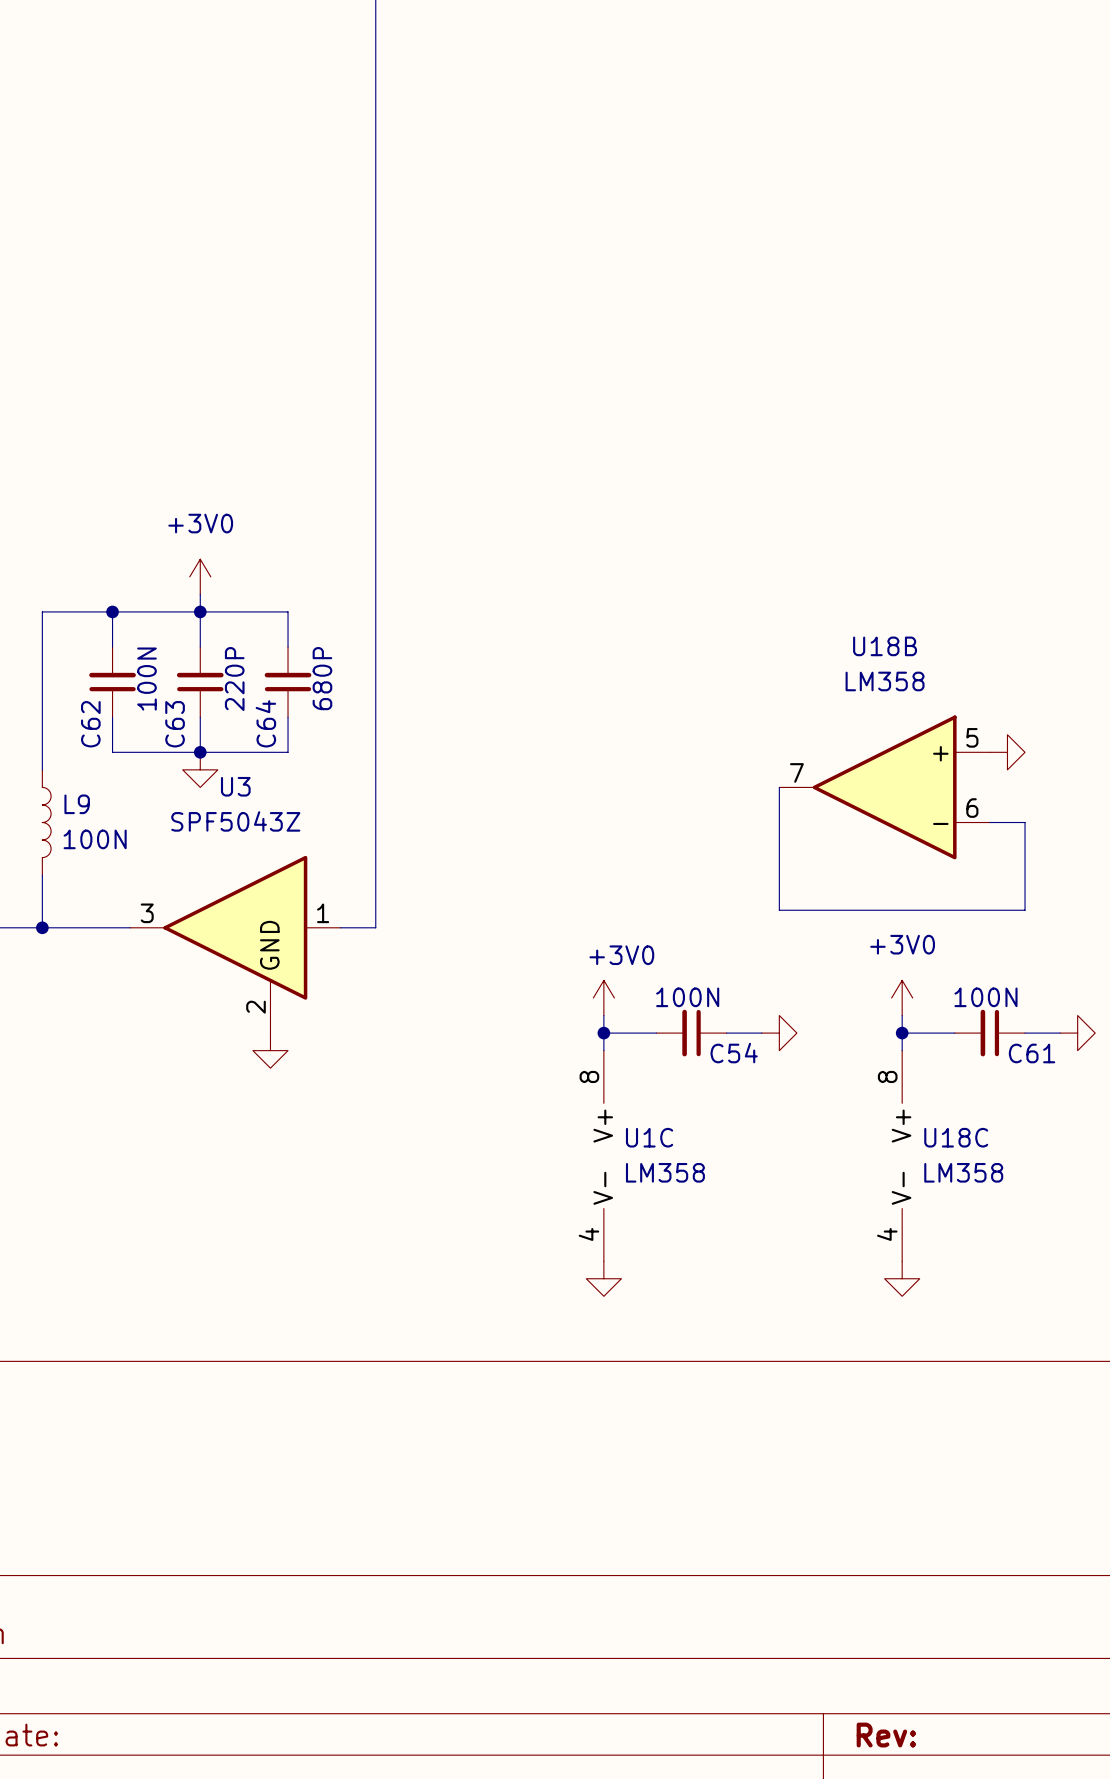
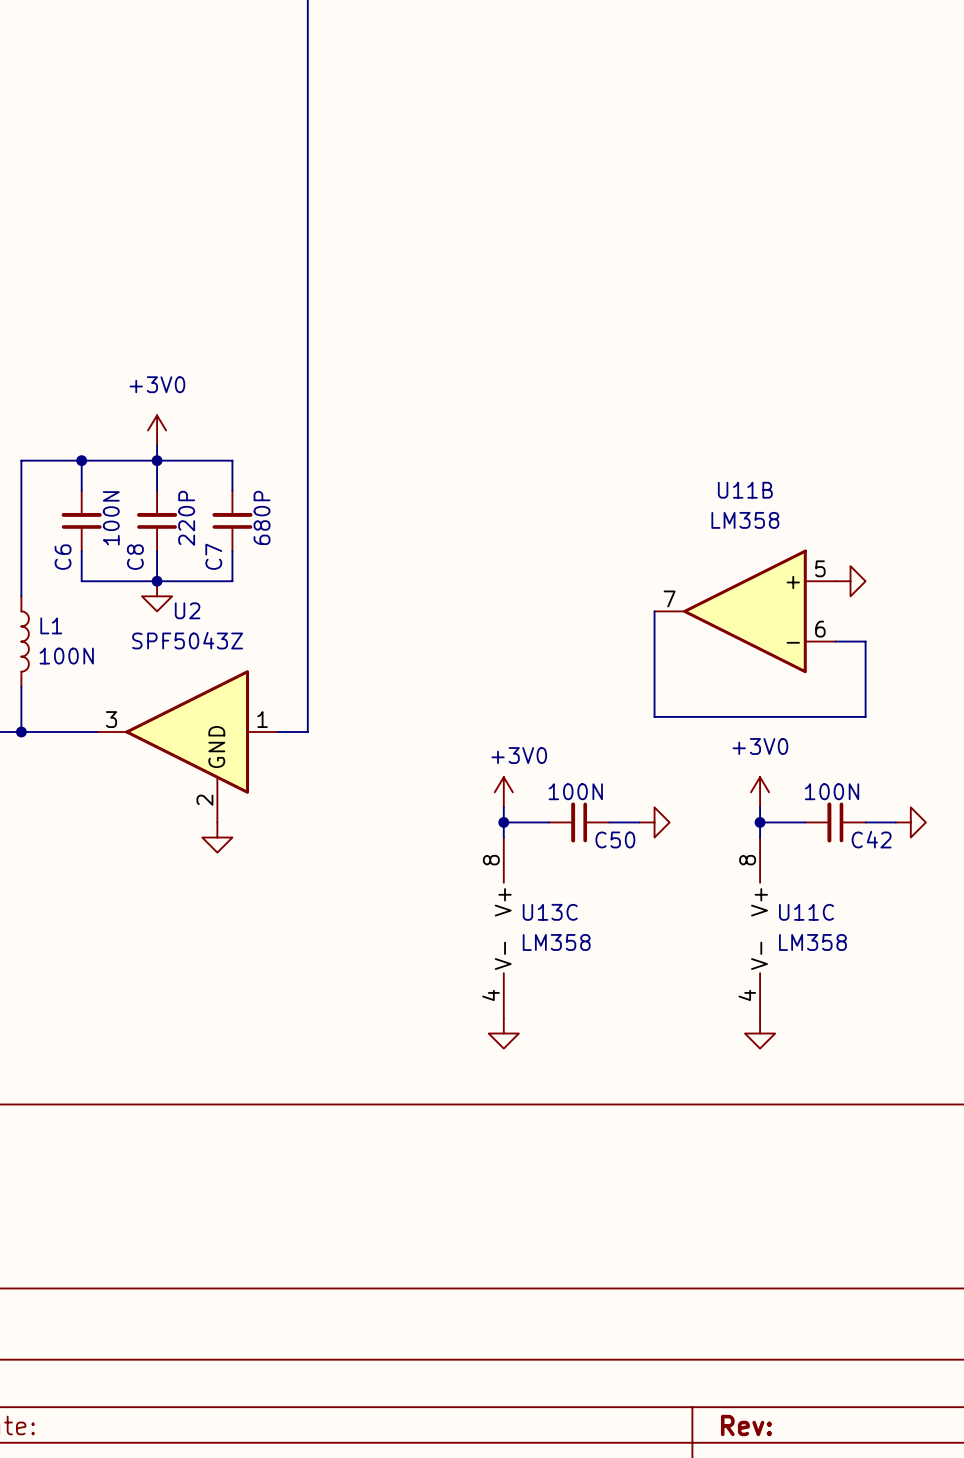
U18B name: U18B (885, 646) -> U11B (745, 490)
C64 name: C64 (265, 723) -> C7 (213, 556)
C62 name: C62 (90, 724) -> C6 (63, 557)
C63 name: C63 (175, 724) -> C8 (135, 557)
U3 name: U3 (235, 786) -> U2 (187, 610)
L9 name: L9 (77, 804) -> L1 (51, 625)
C54 name: C54 (734, 1053) -> C50 (615, 839)
C61 name: C61 (1032, 1053) -> C42 (871, 839)
U1C name: U1C (649, 1137) -> U13C (550, 912)
U18C name: U18C (956, 1137) -> U11C (806, 912)

